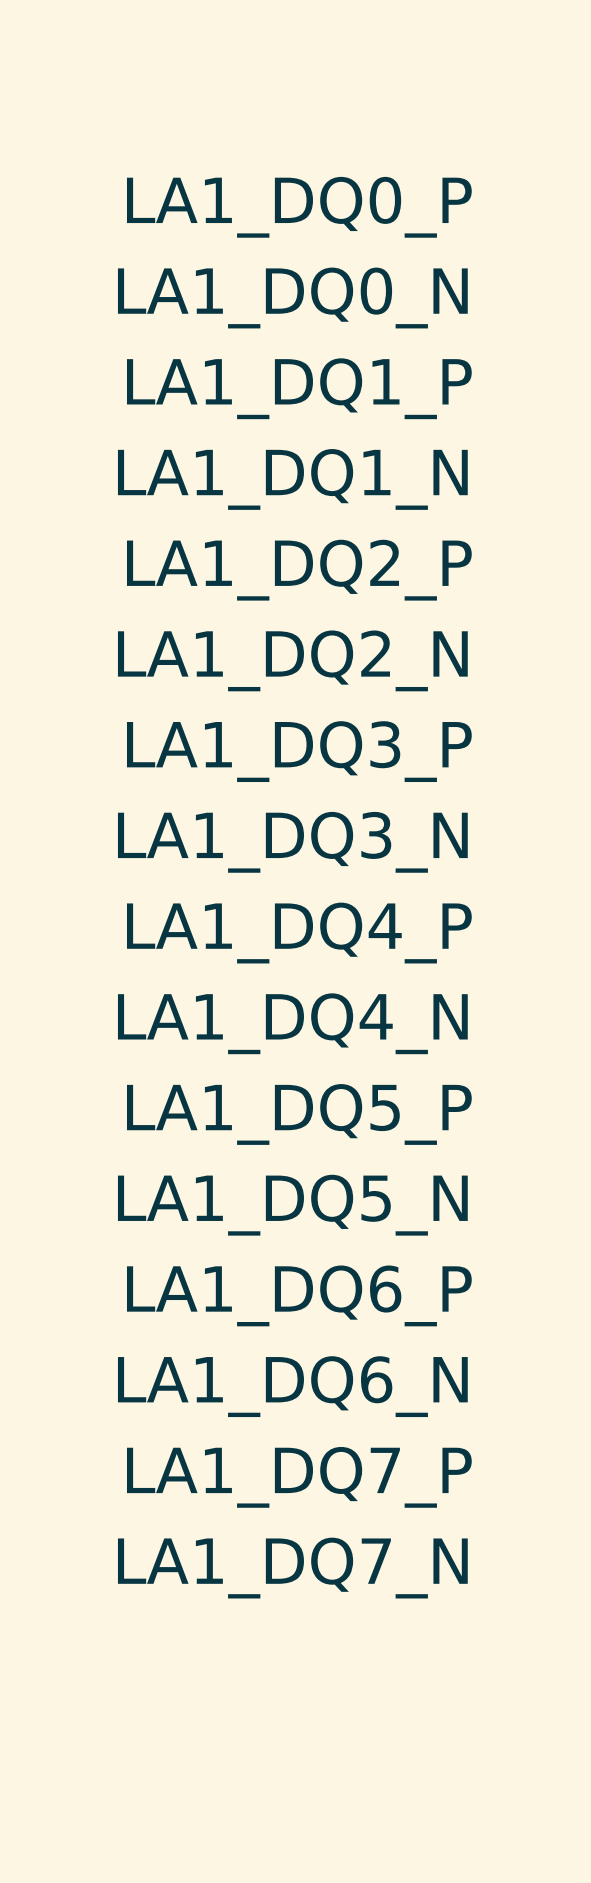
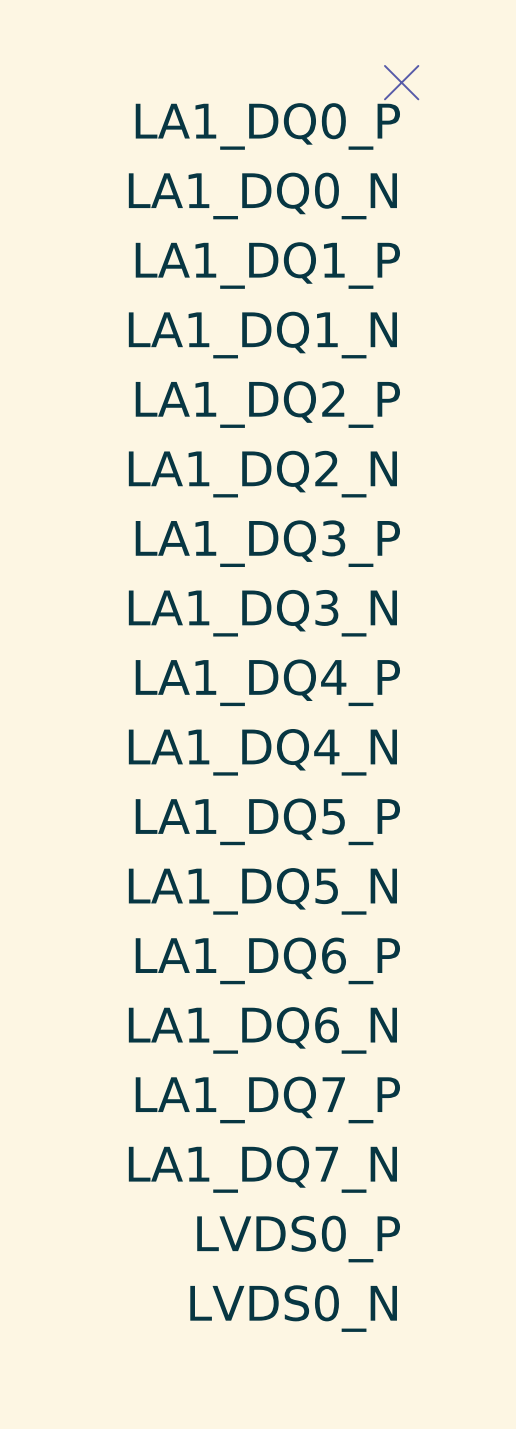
no-connect mark: none -> (401, 82)
label: none -> LVDS0_P (298, 1239)
label: none -> LVDS0_N (293, 1308)

